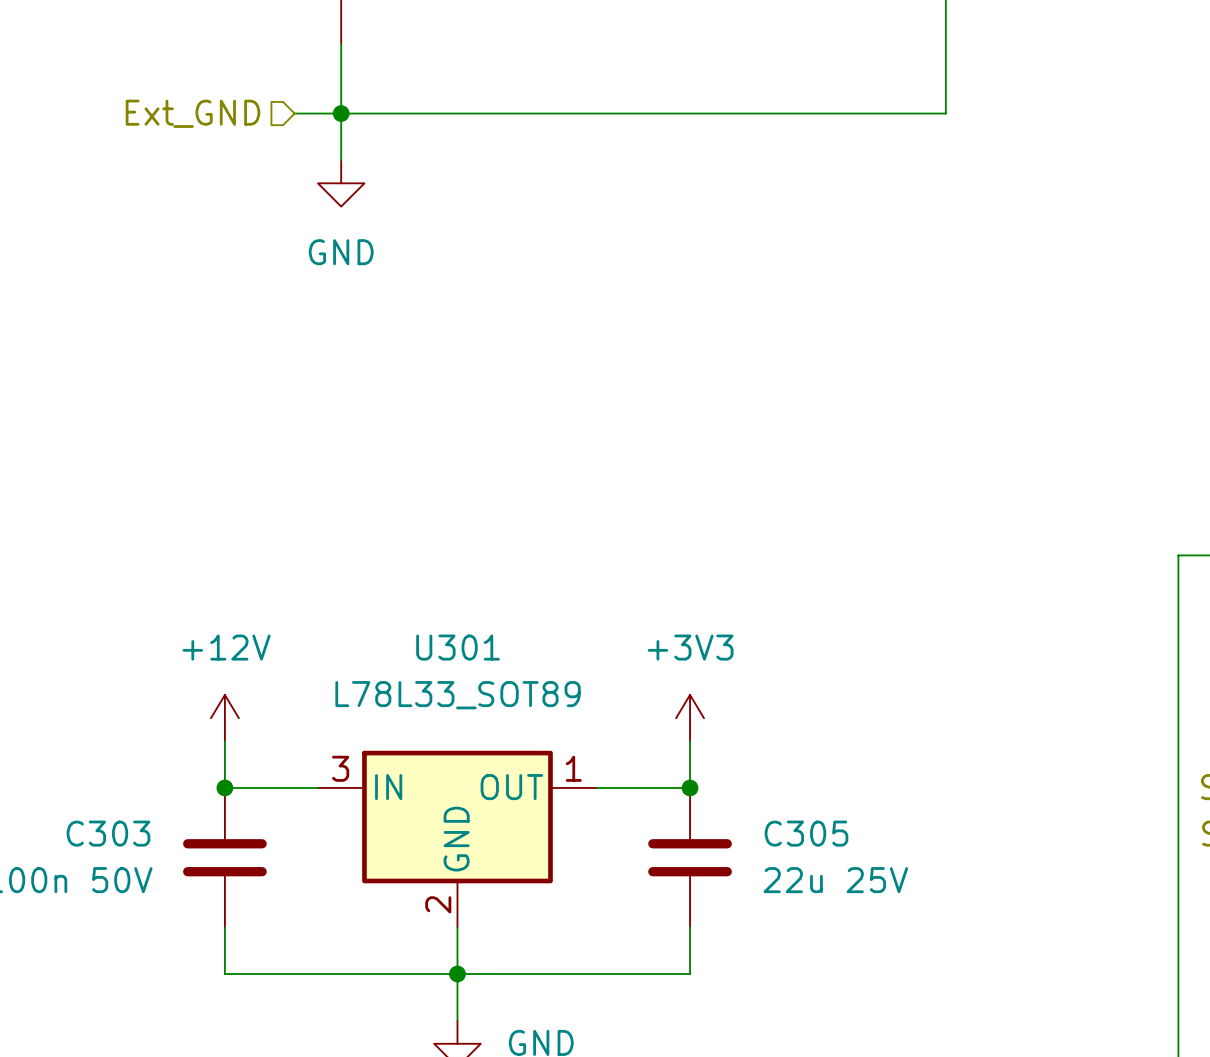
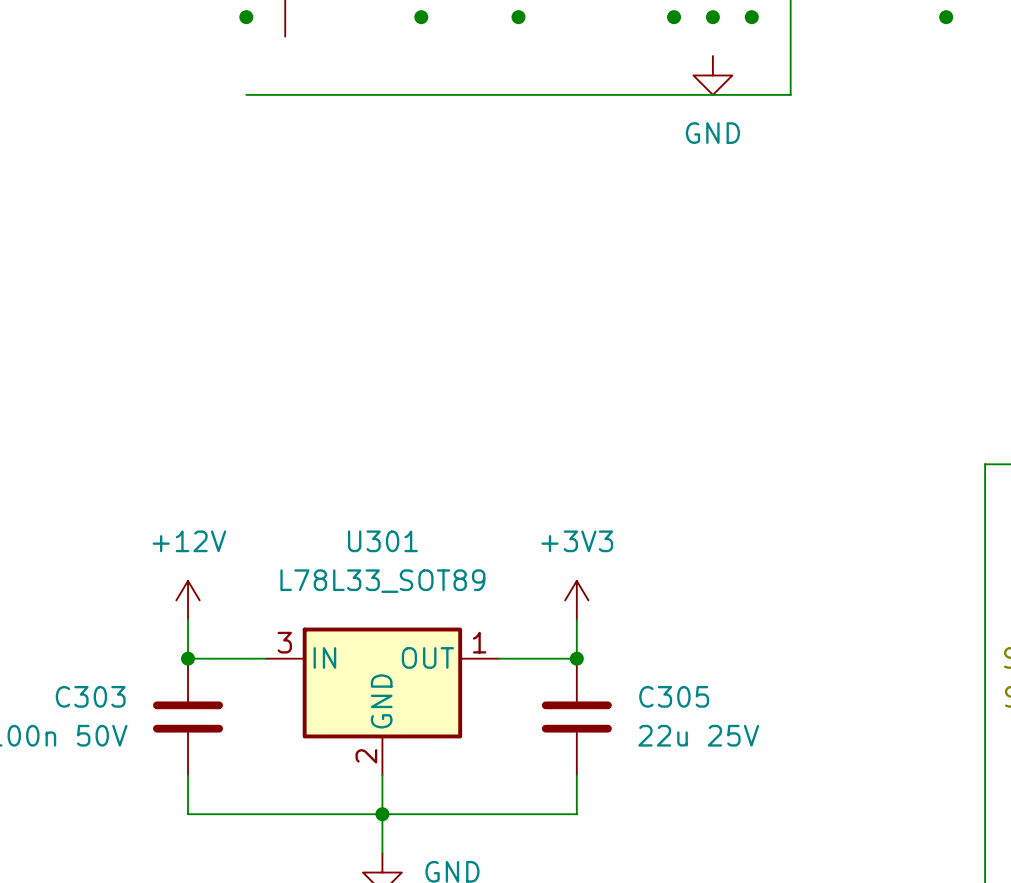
junction: none -> (246, 17)
junction: none -> (421, 17)
junction: none -> (518, 17)
junction: none -> (674, 17)
junction: none -> (712, 17)
junction: none -> (751, 17)
junction: none -> (946, 17)
wire: (341, 43) (341, 160) -> none
power symbol: none -> GND (712, 75)
hierarchical label: Ext_GND (192, 113) -> none
junction: (341, 113) -> none
power symbol: GND (341, 183) -> none

